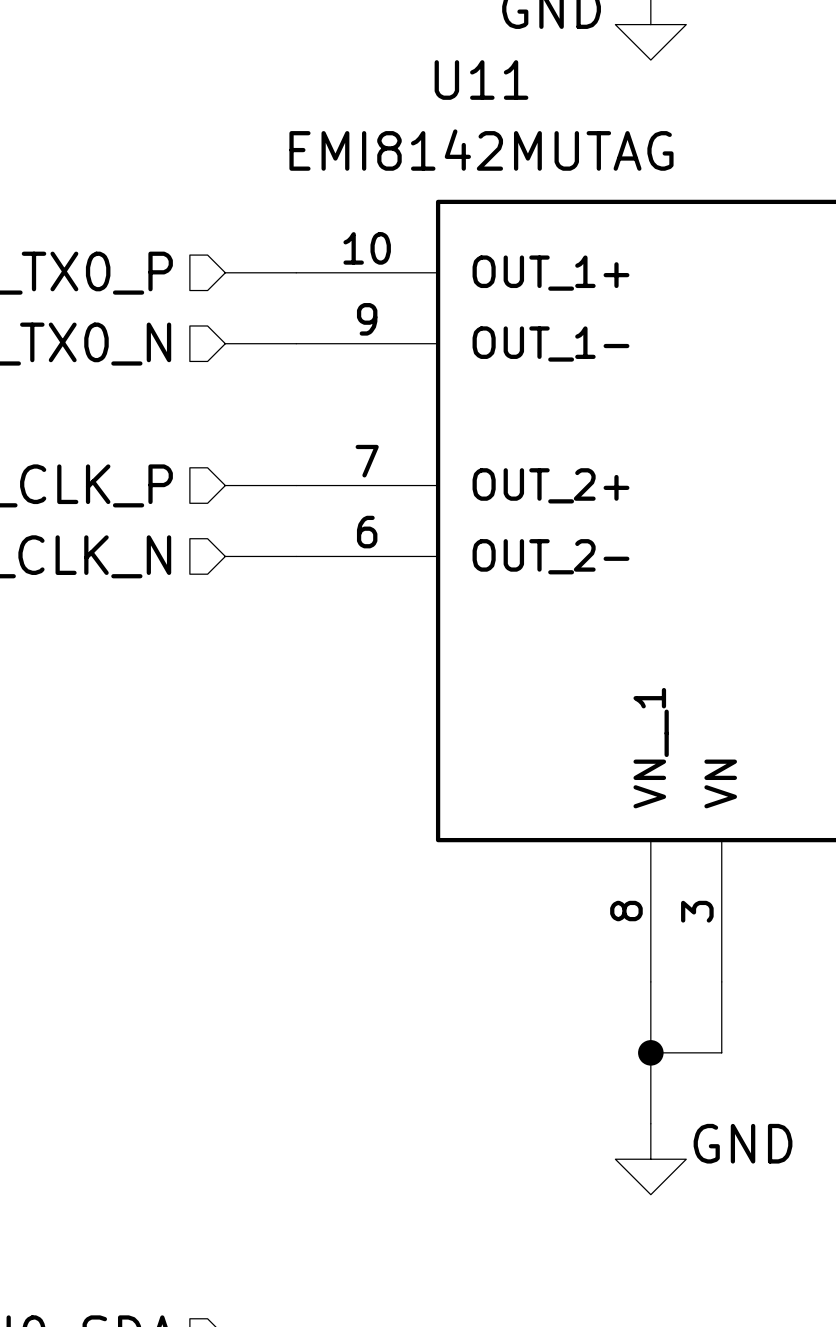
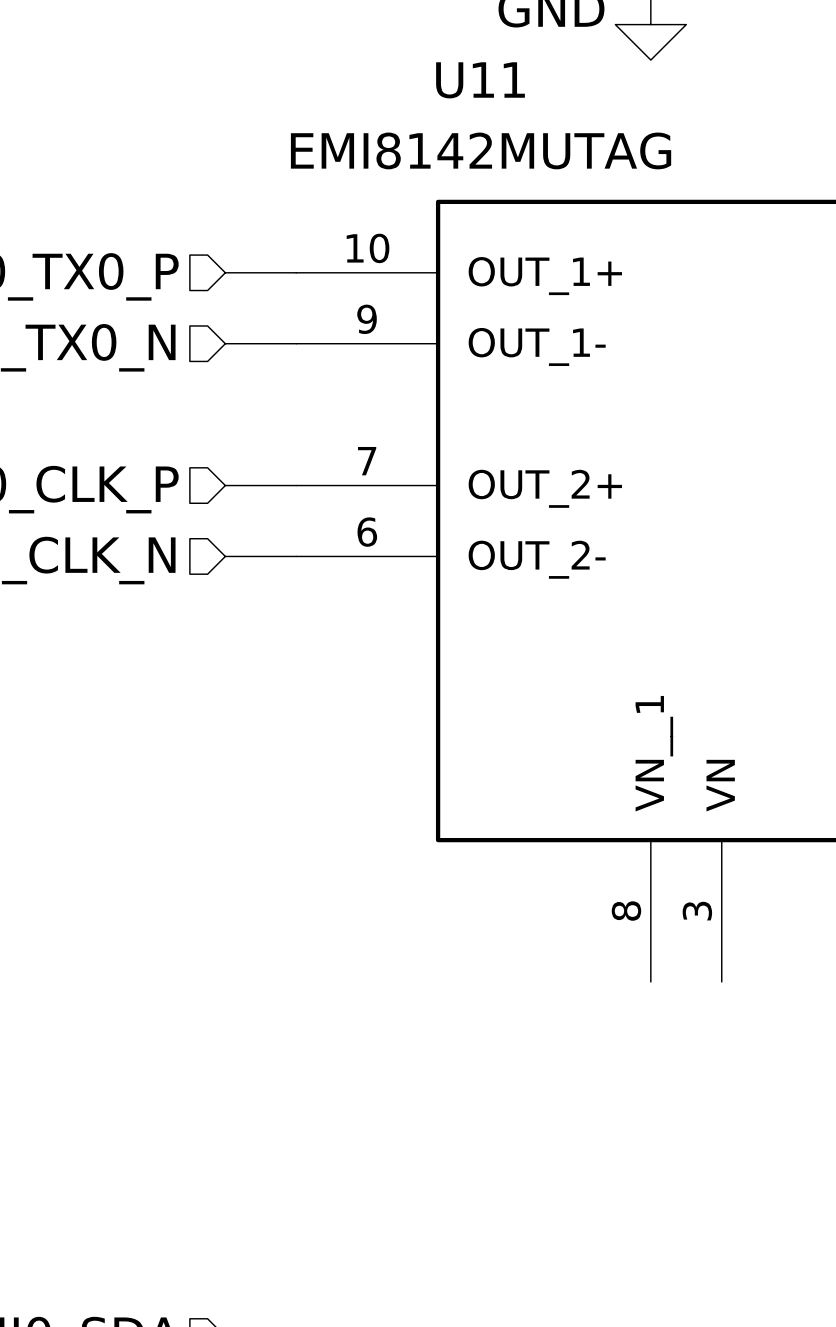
wire: (650, 981) (650, 1123) -> none
wire: (721, 981) (721, 1052) (650, 1052) -> none
junction: (650, 1052) -> none
power symbol: GND (650, 1159) -> none

